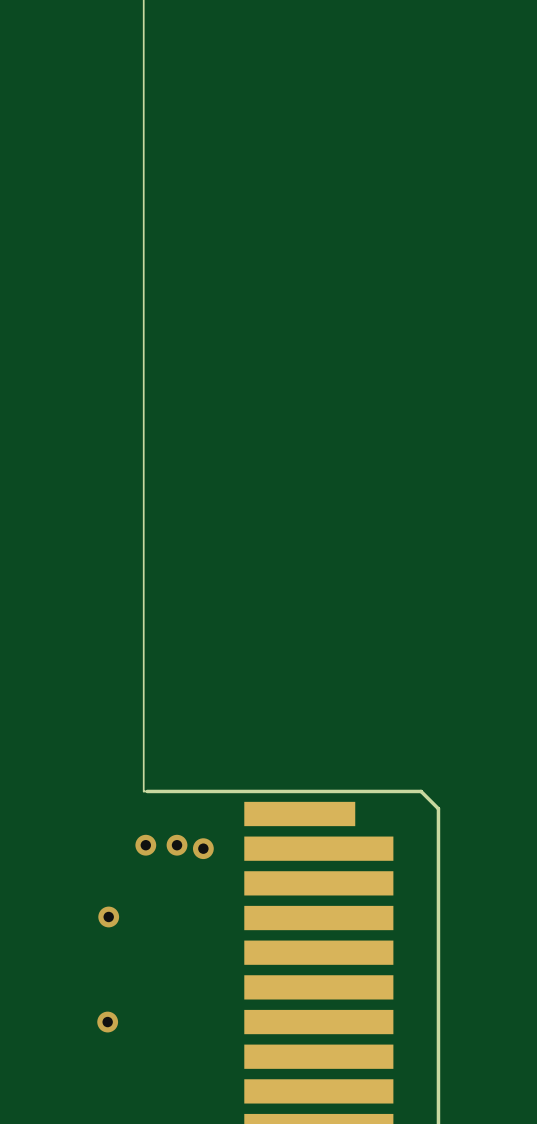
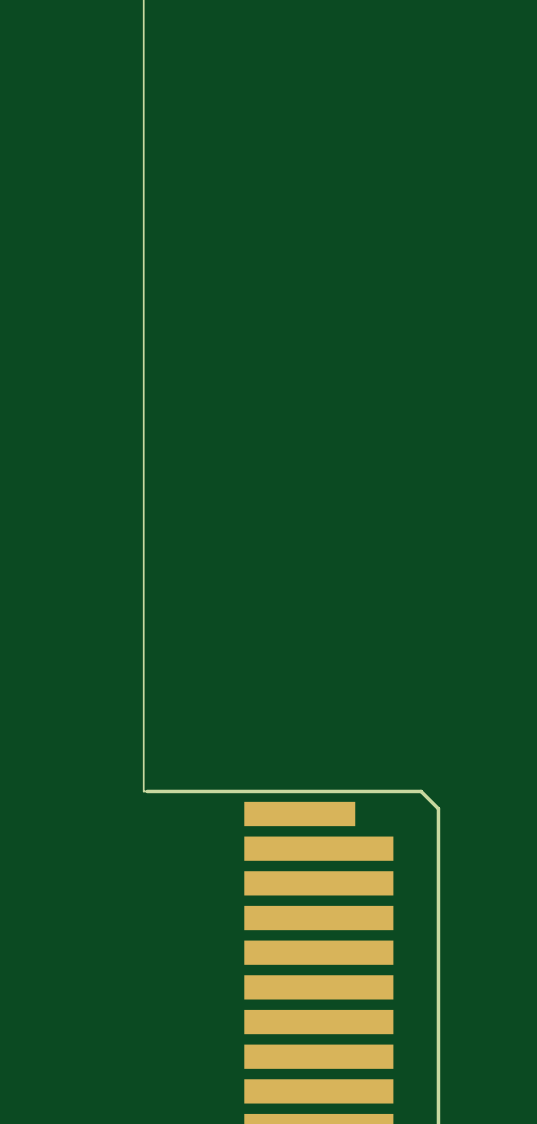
via: (145, 845) -> none
via: (177, 845) -> none
via: (203, 848) -> none
via: (108, 916) -> none
via: (107, 1022) -> none

